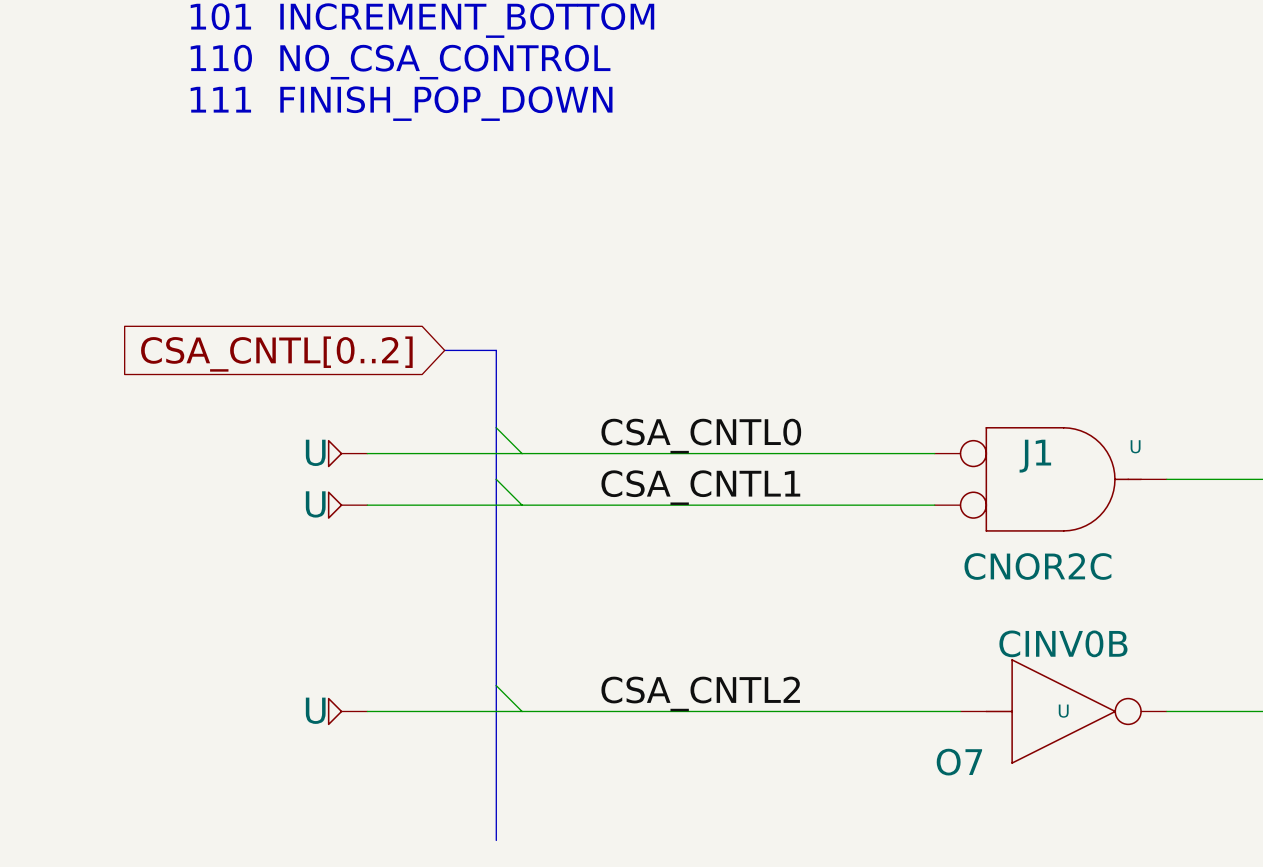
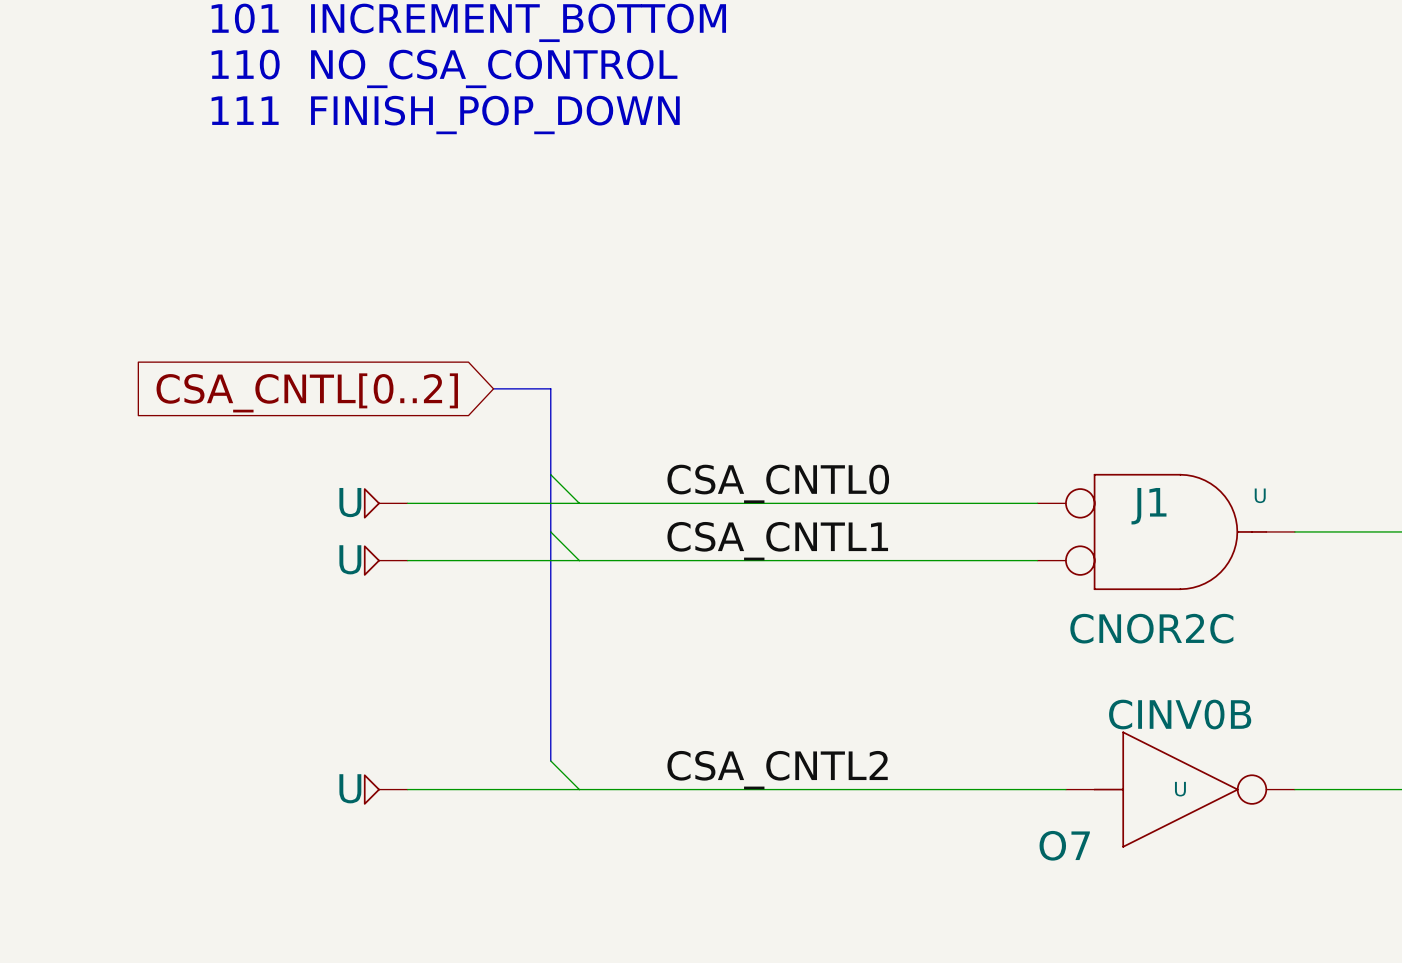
bus: (496, 685) (496, 840) -> none

